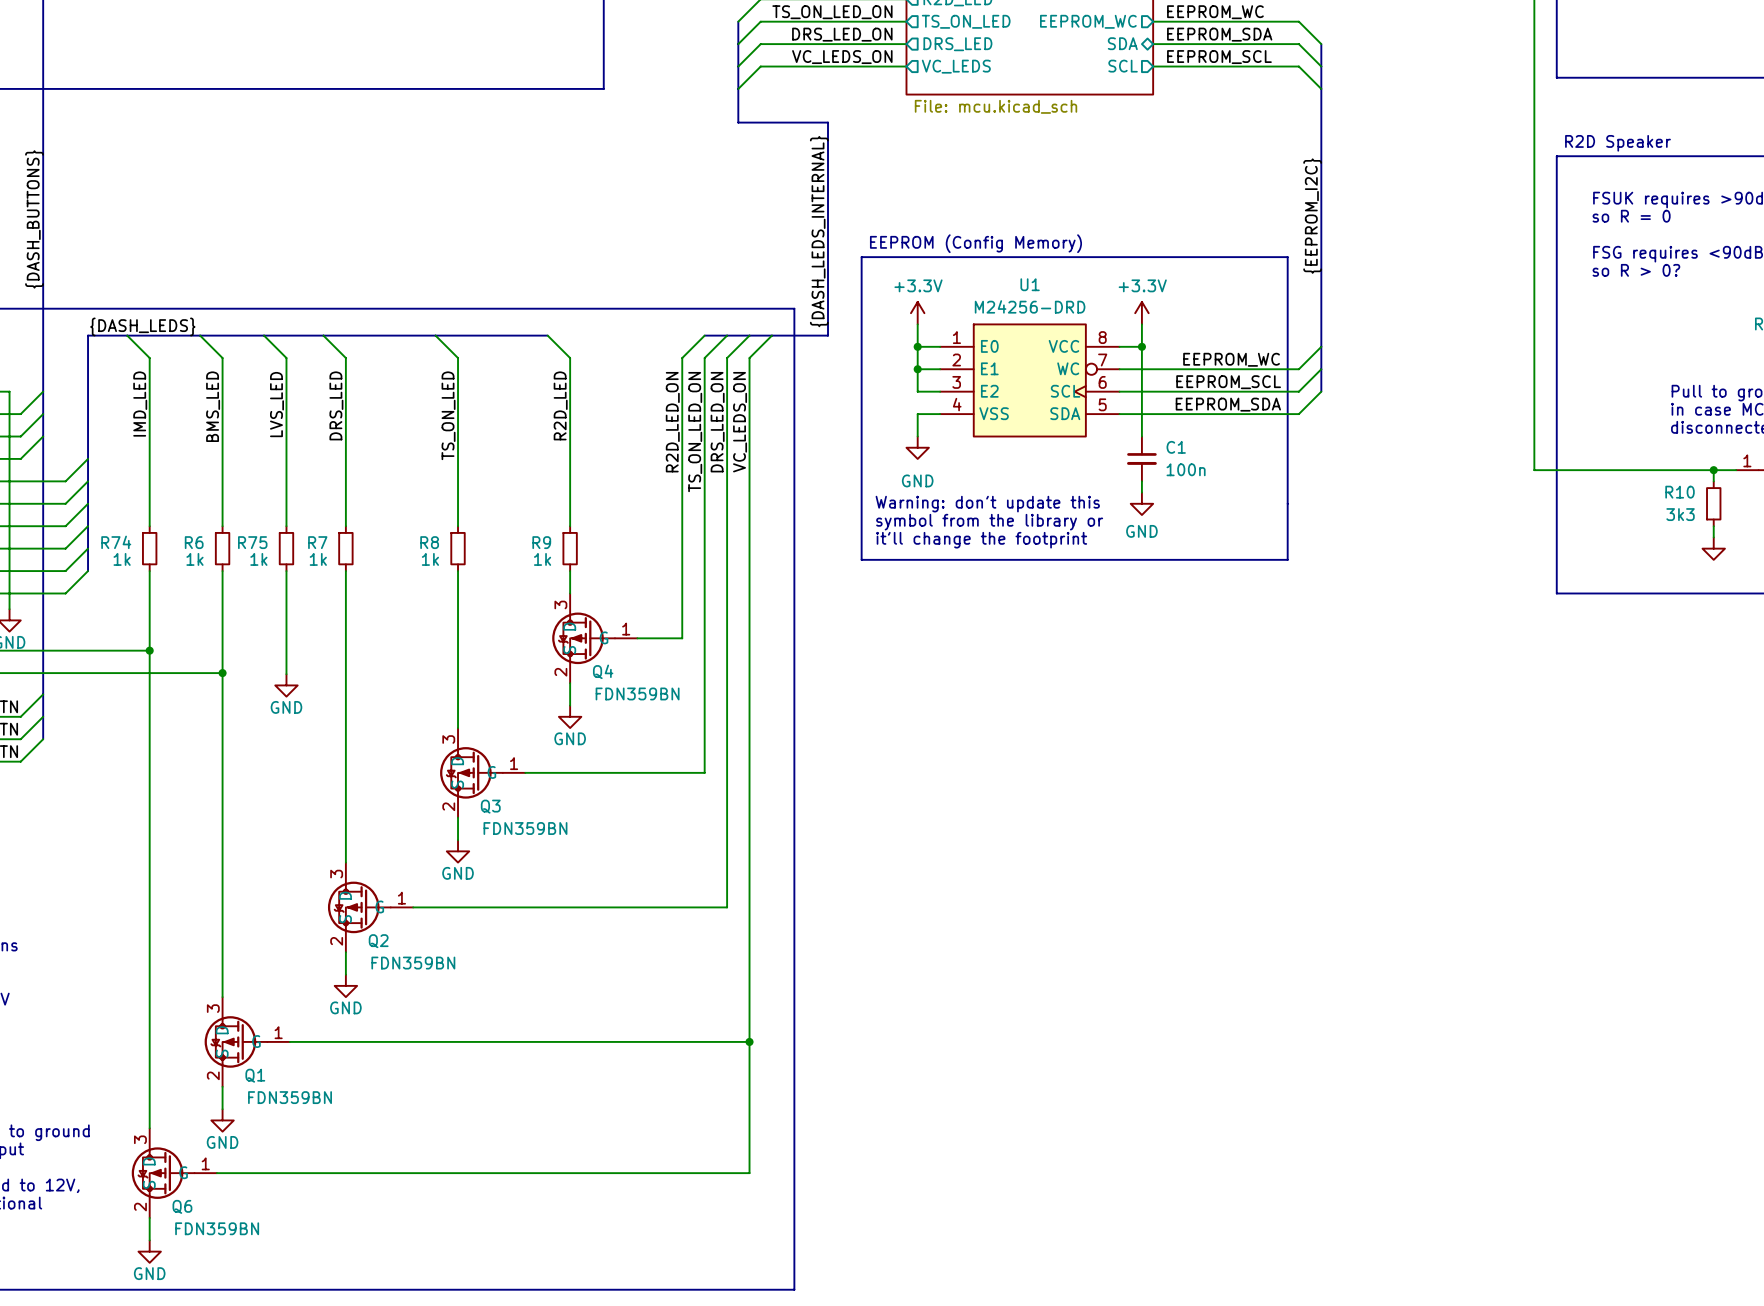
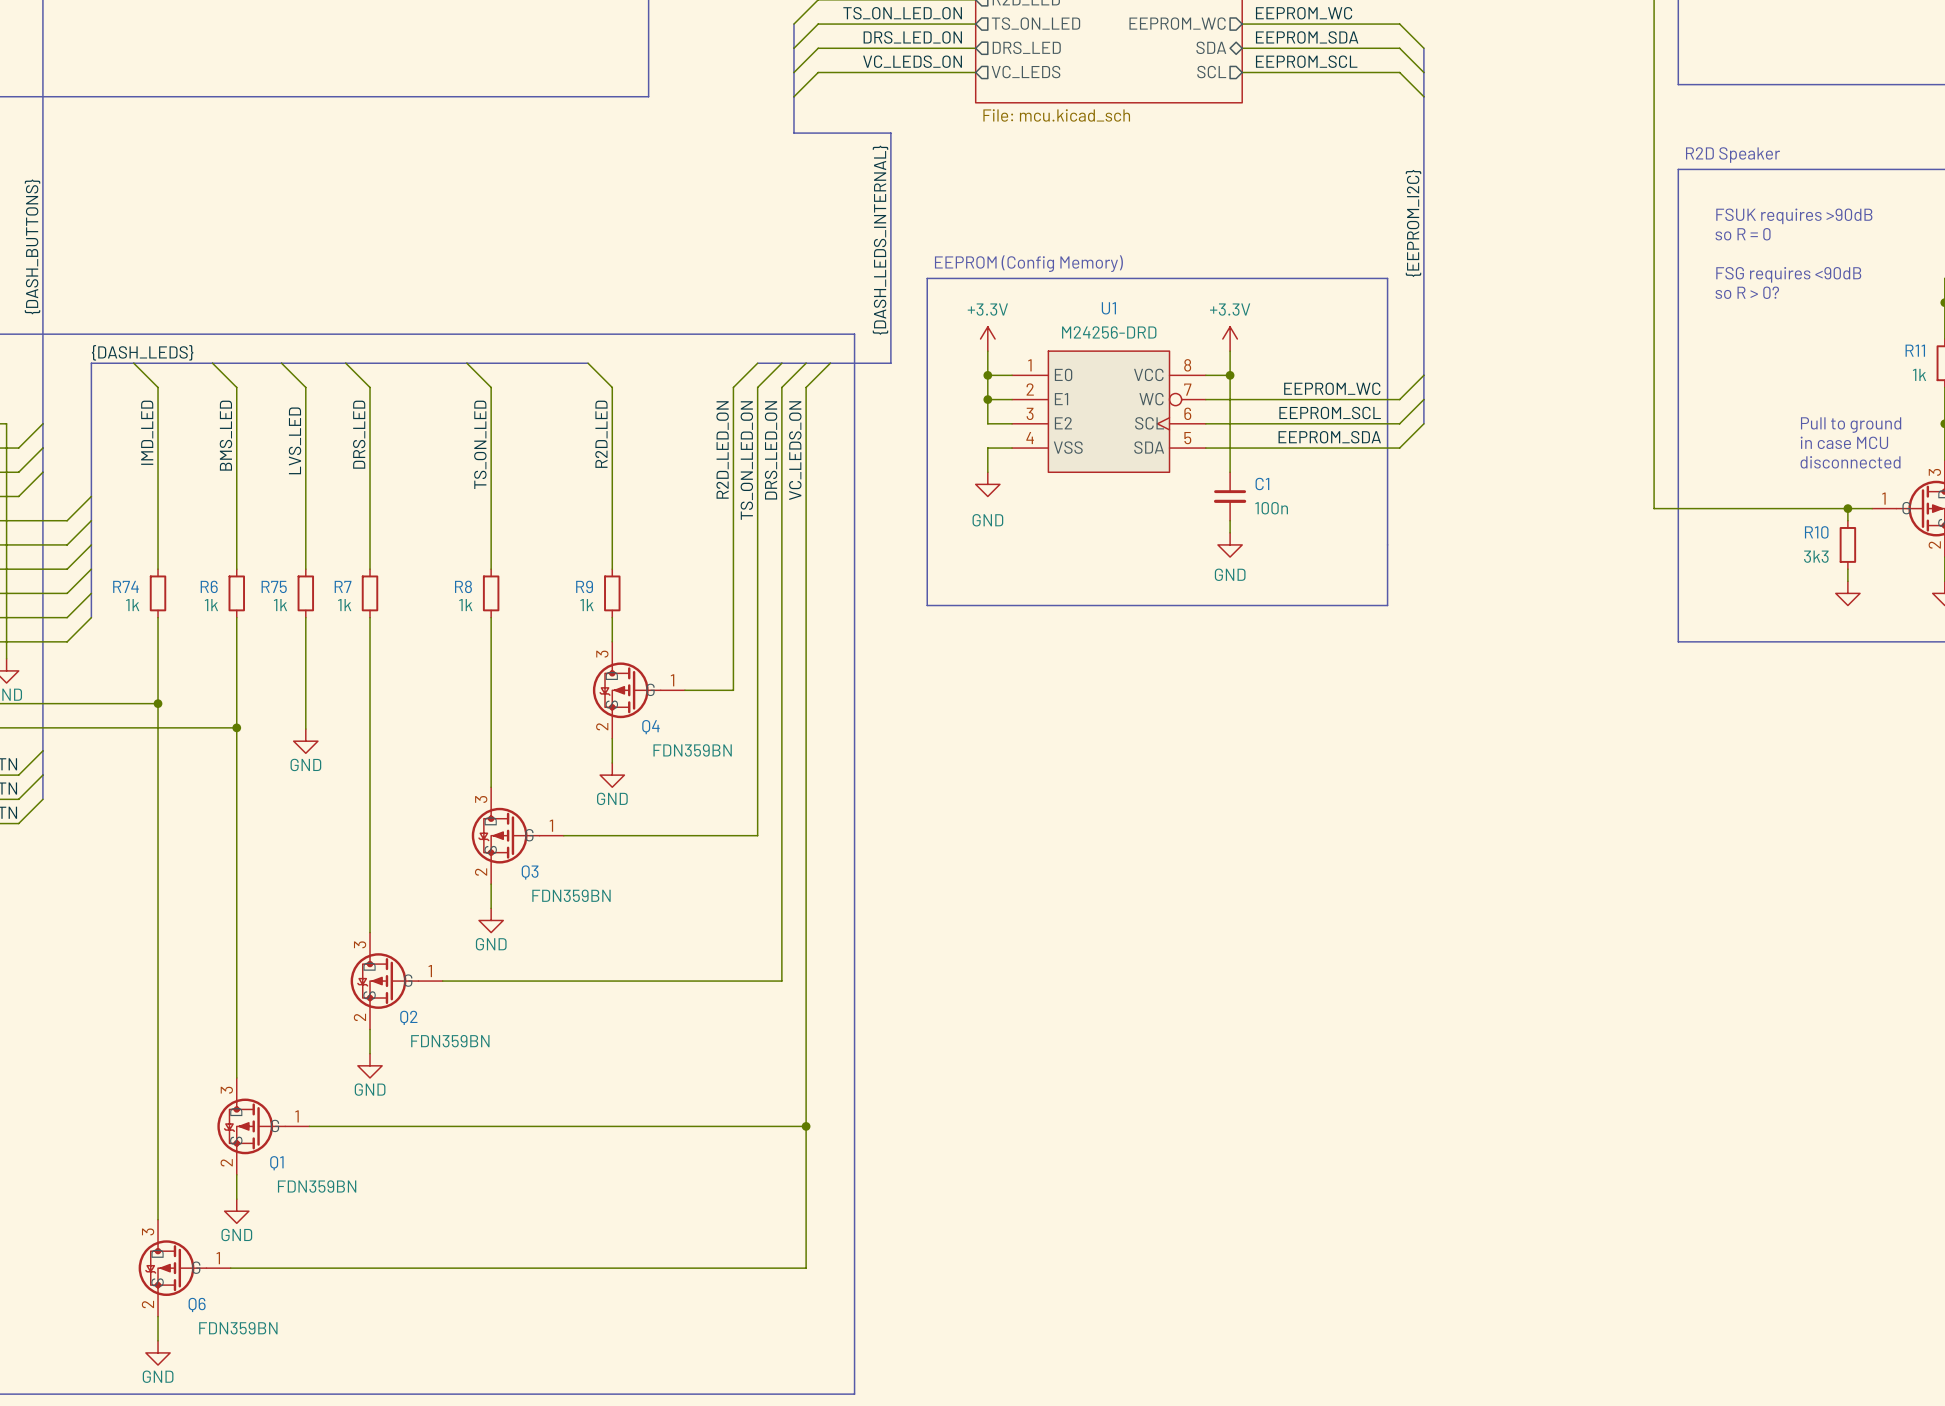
text: Warning: don't update this (987, 504) -> none
text: symbol from the library or (989, 522) -> none
text: it'll change the footprint (981, 540) -> none

